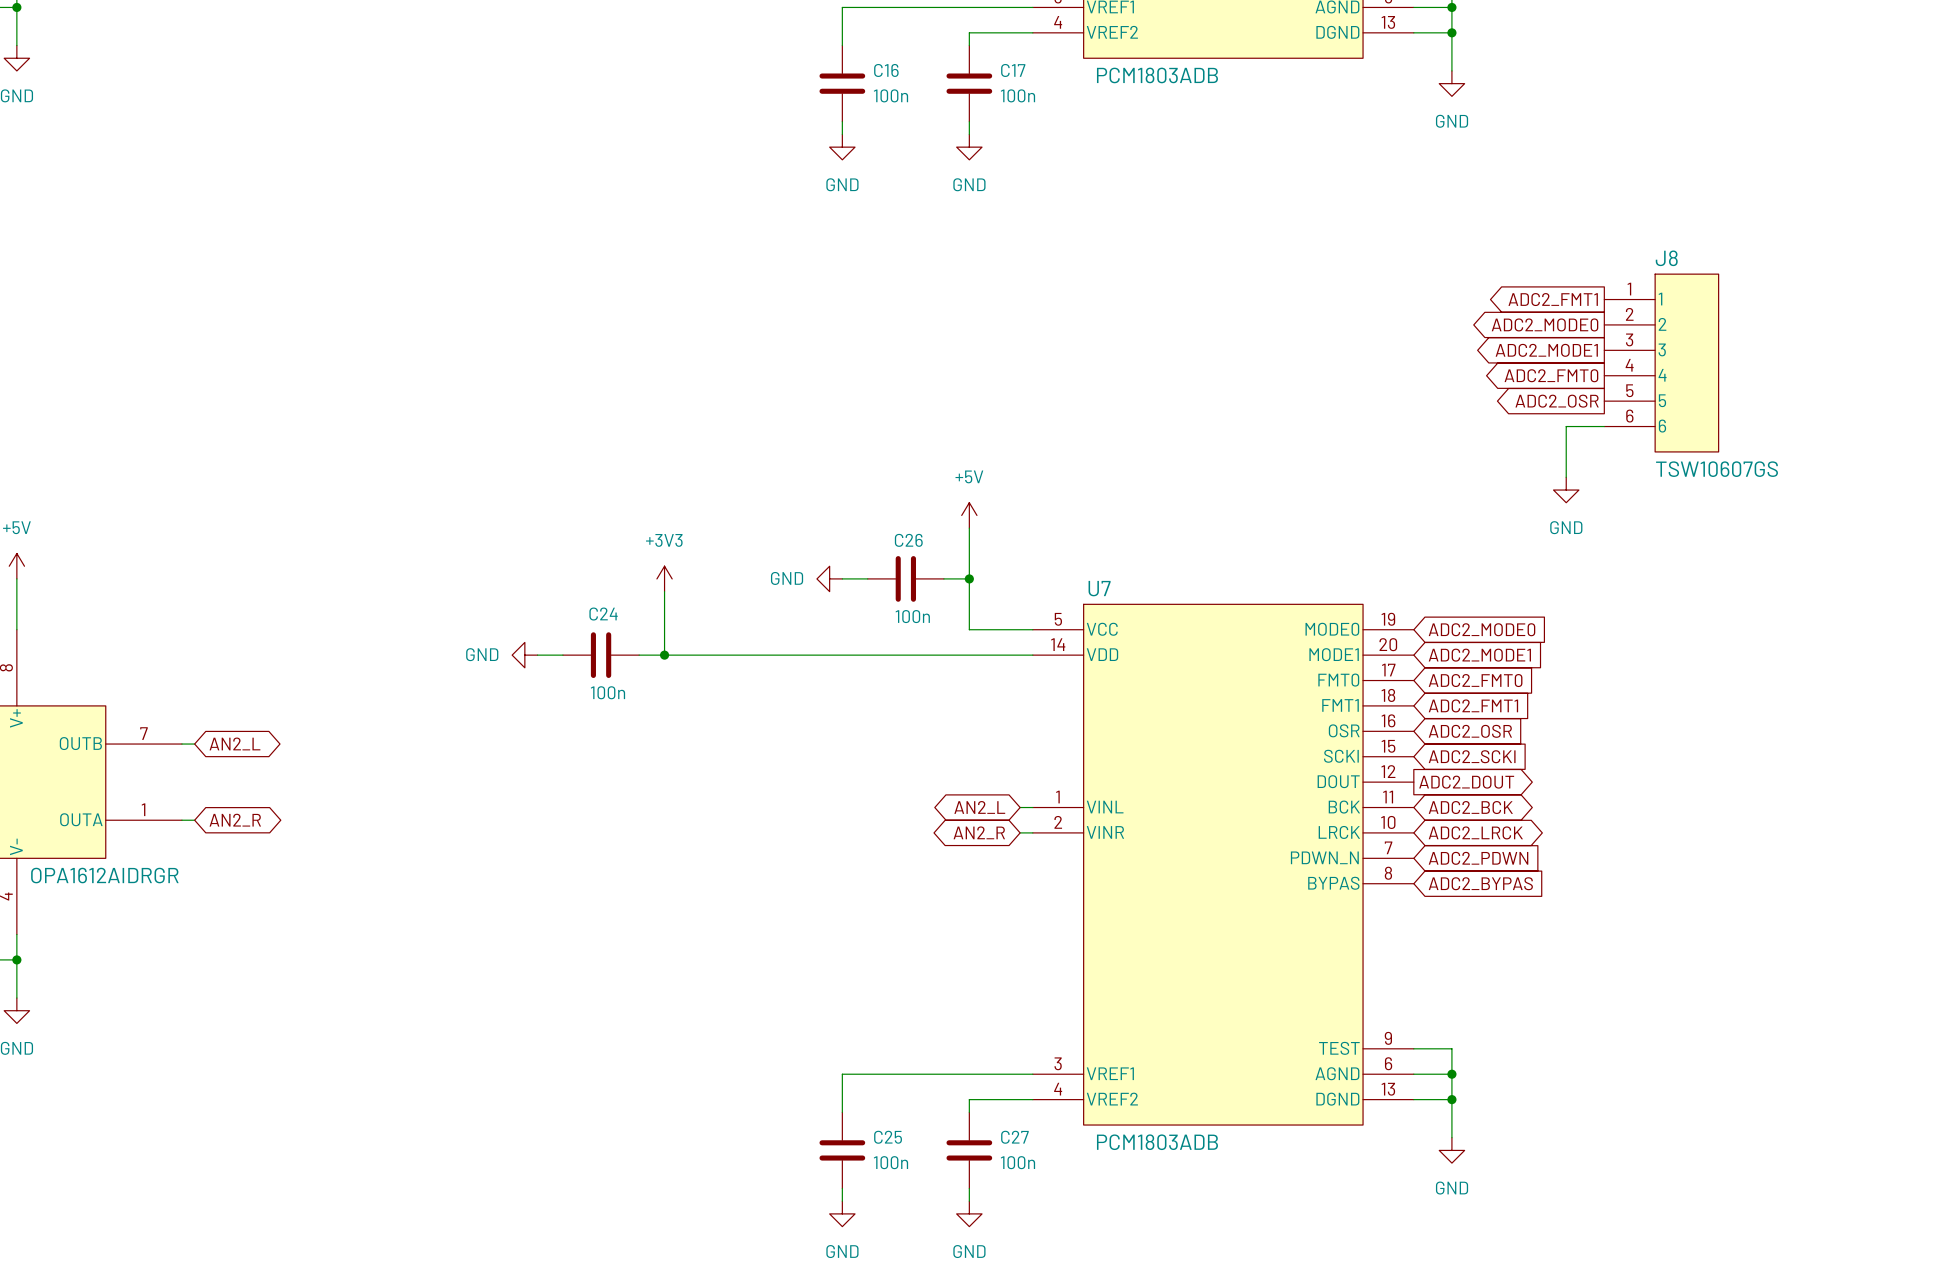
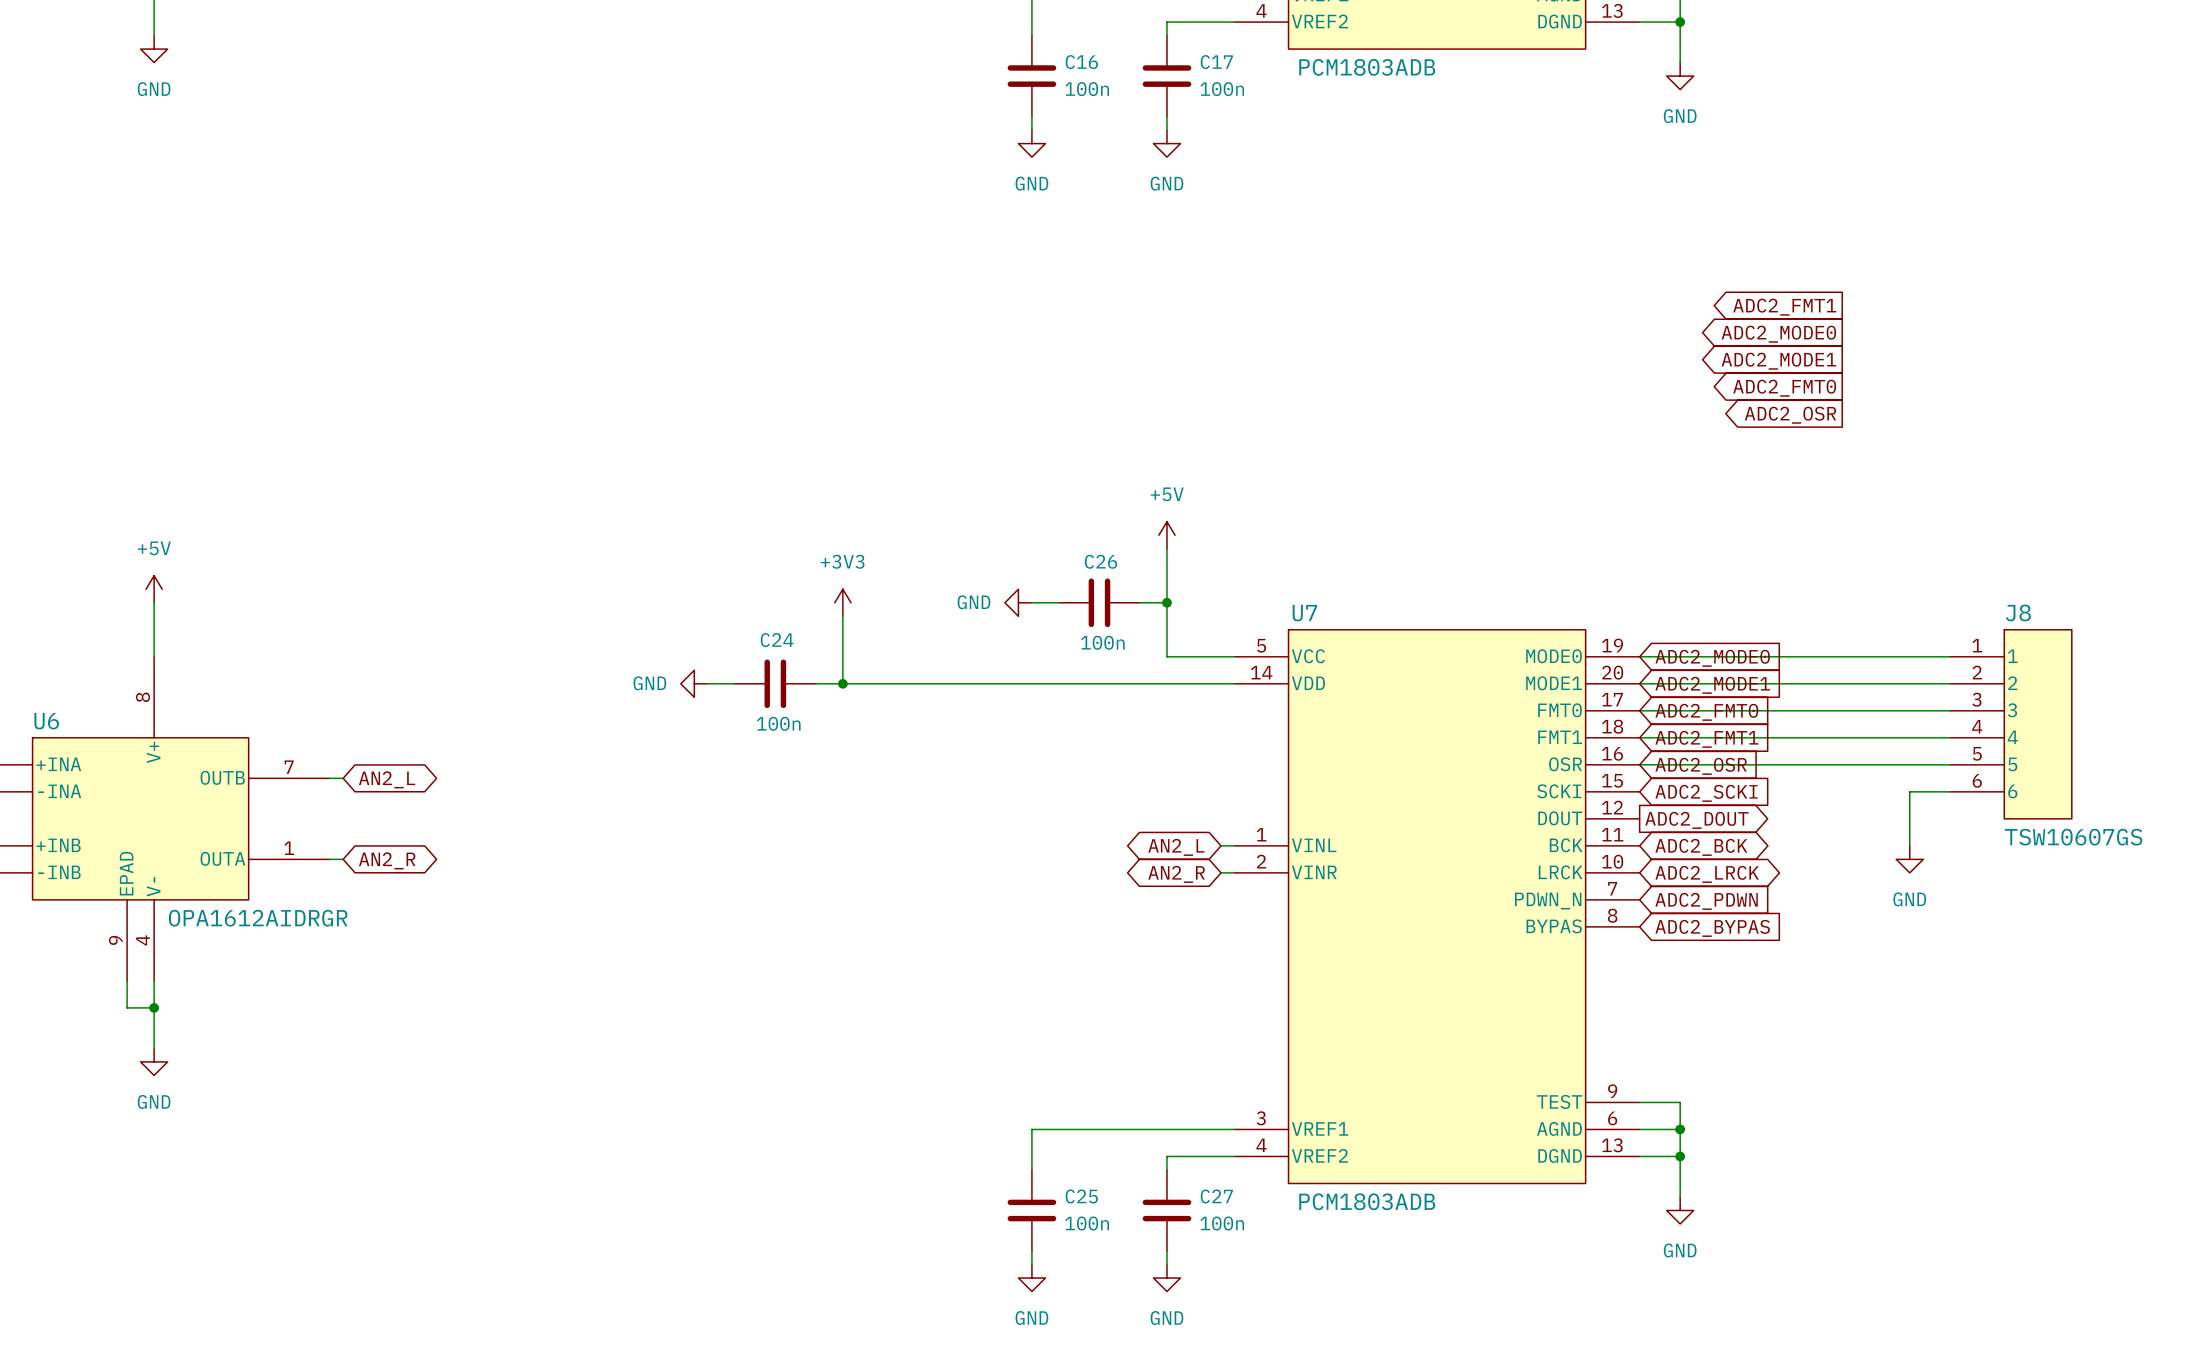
J8 position: (1661, 363) -> (2011, 724)
wire: (1604, 426) (1566, 426) (1566, 477) -> none
power symbol: GND (1566, 490) -> none
wire: none -> (1639, 656) (1950, 656)
wire: none -> (1639, 683) (1950, 683)
wire: none -> (1639, 710) (1950, 710)
wire: none -> (1639, 737) (1950, 737)
wire: none -> (1639, 764) (1950, 764)
wire: none -> (1950, 791) (1909, 791) (1909, 845)
power symbol: none -> GND (1909, 859)

